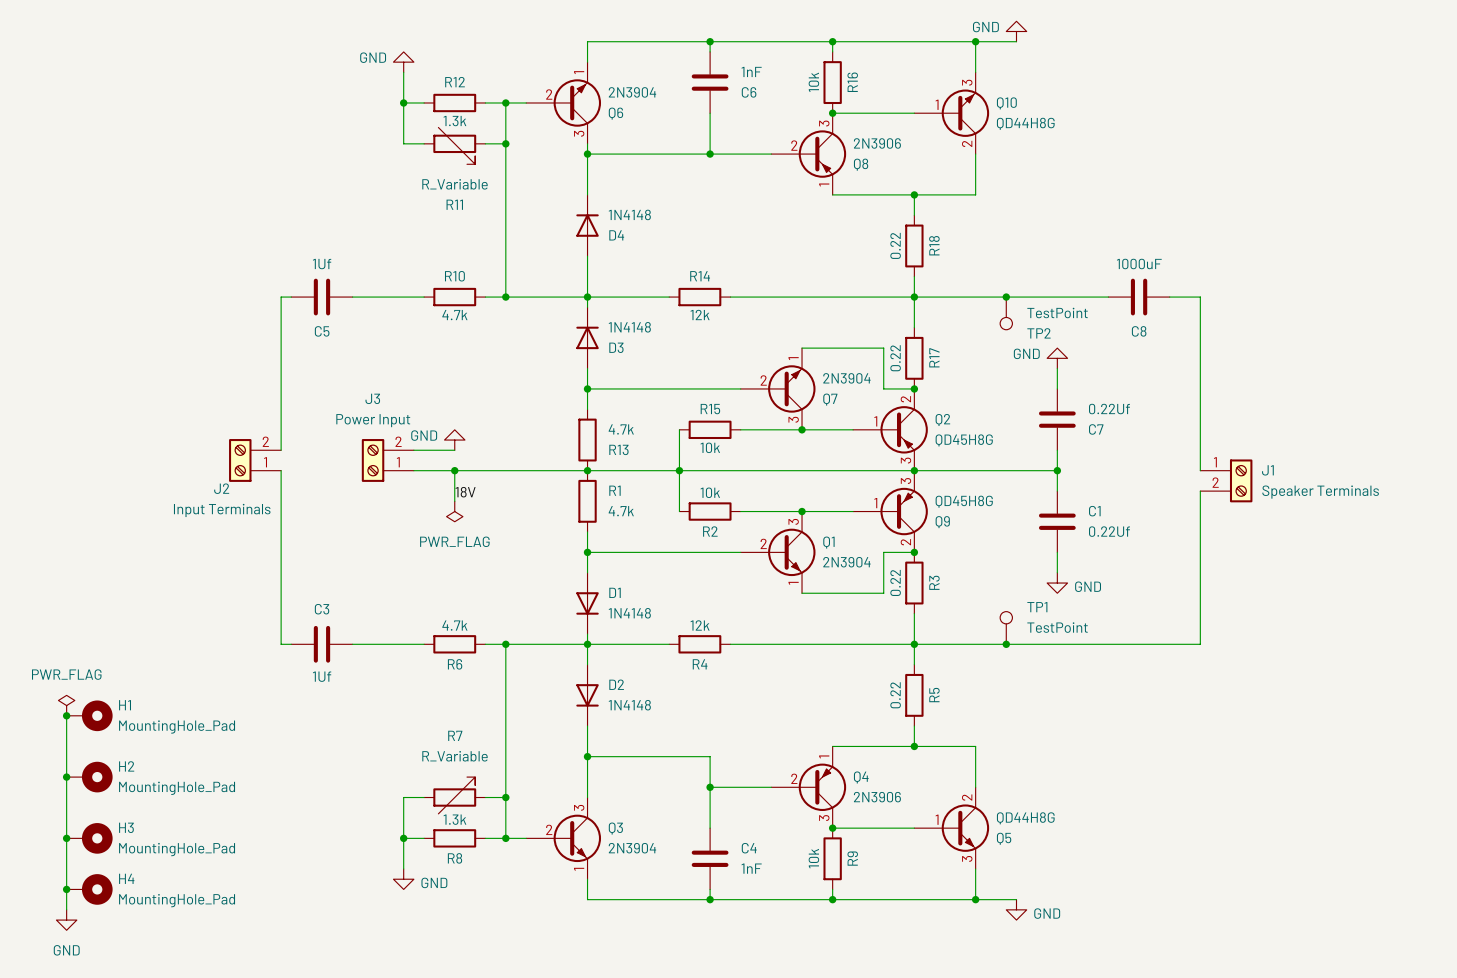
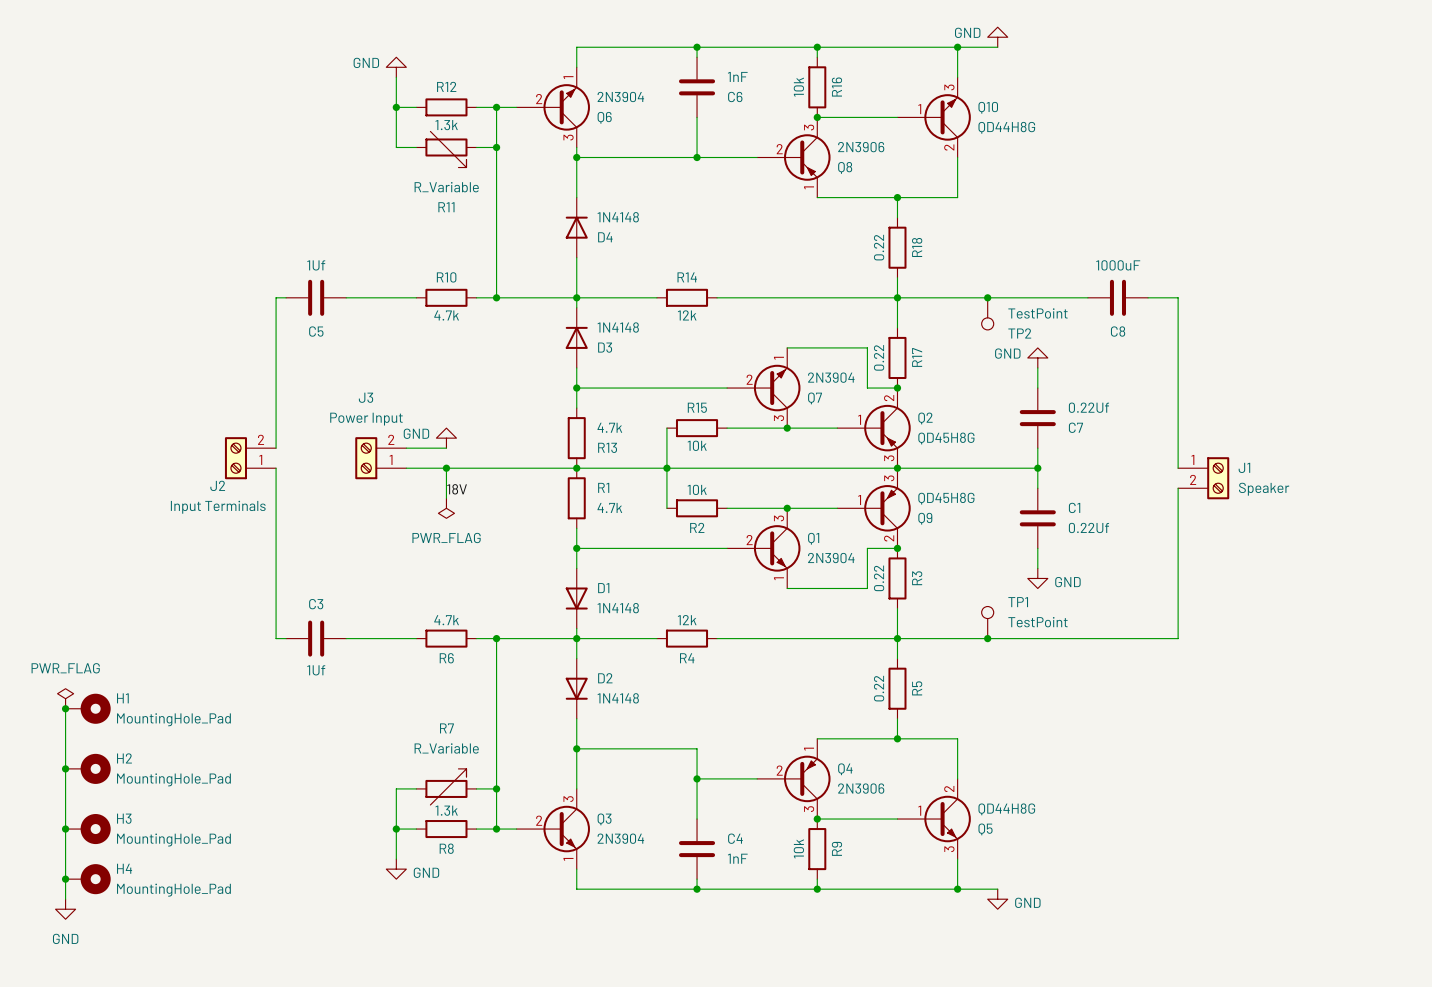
J1 value: Speaker Terminals (1320, 492) -> Speaker (1264, 489)

